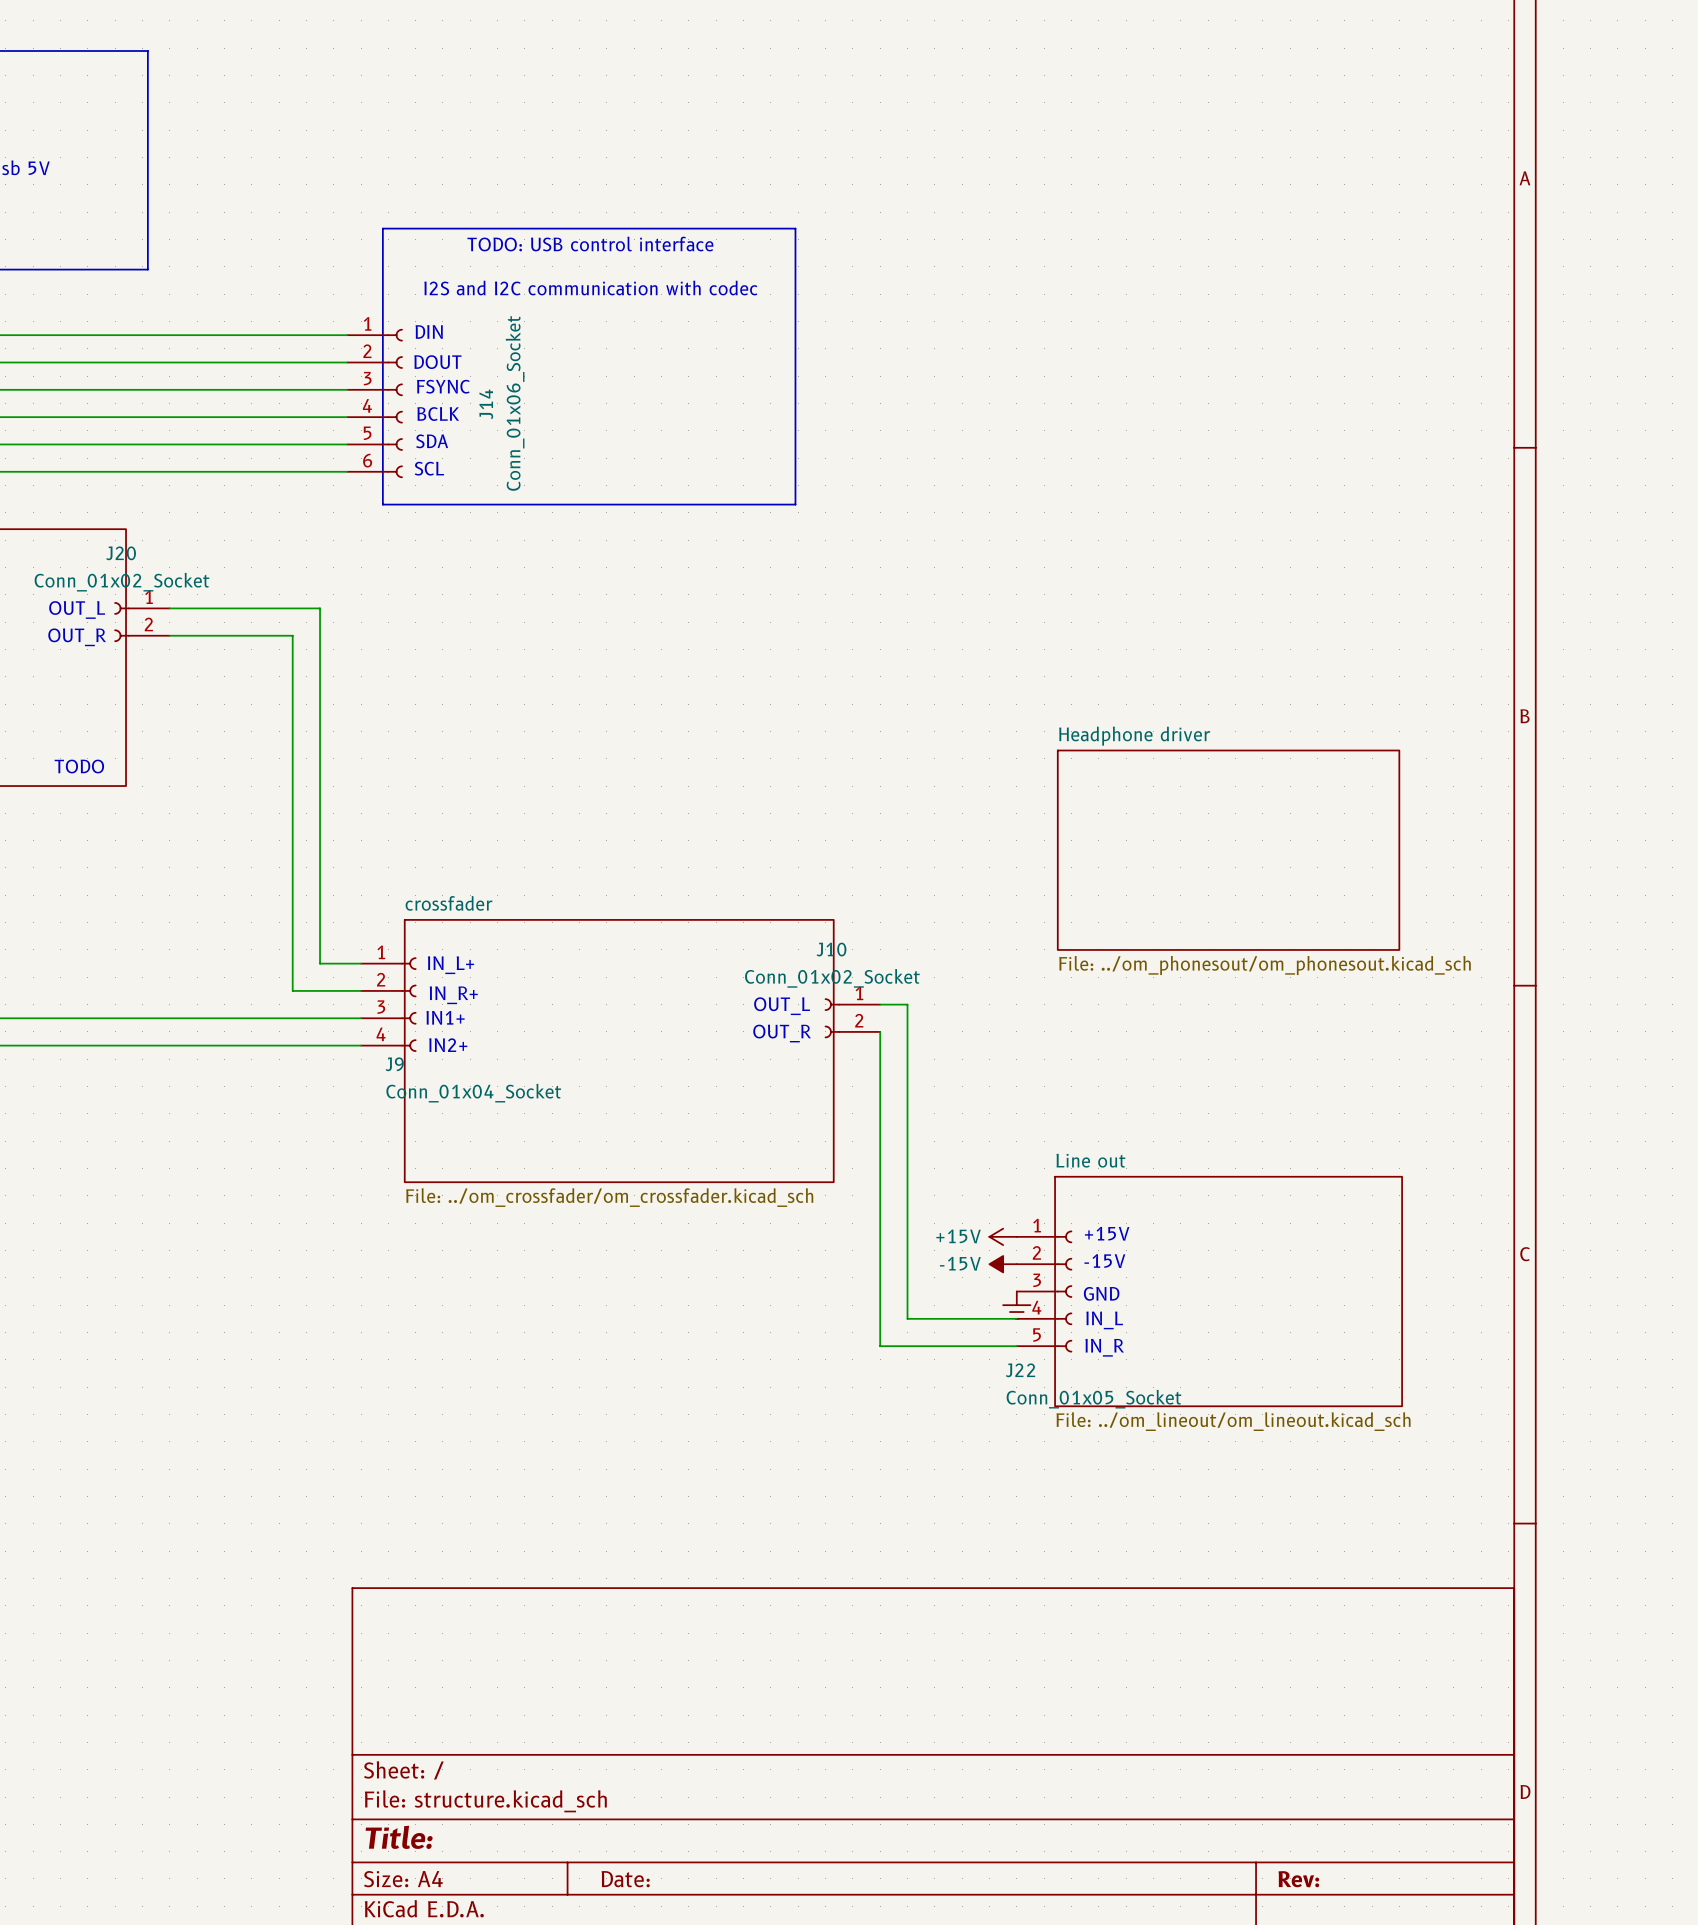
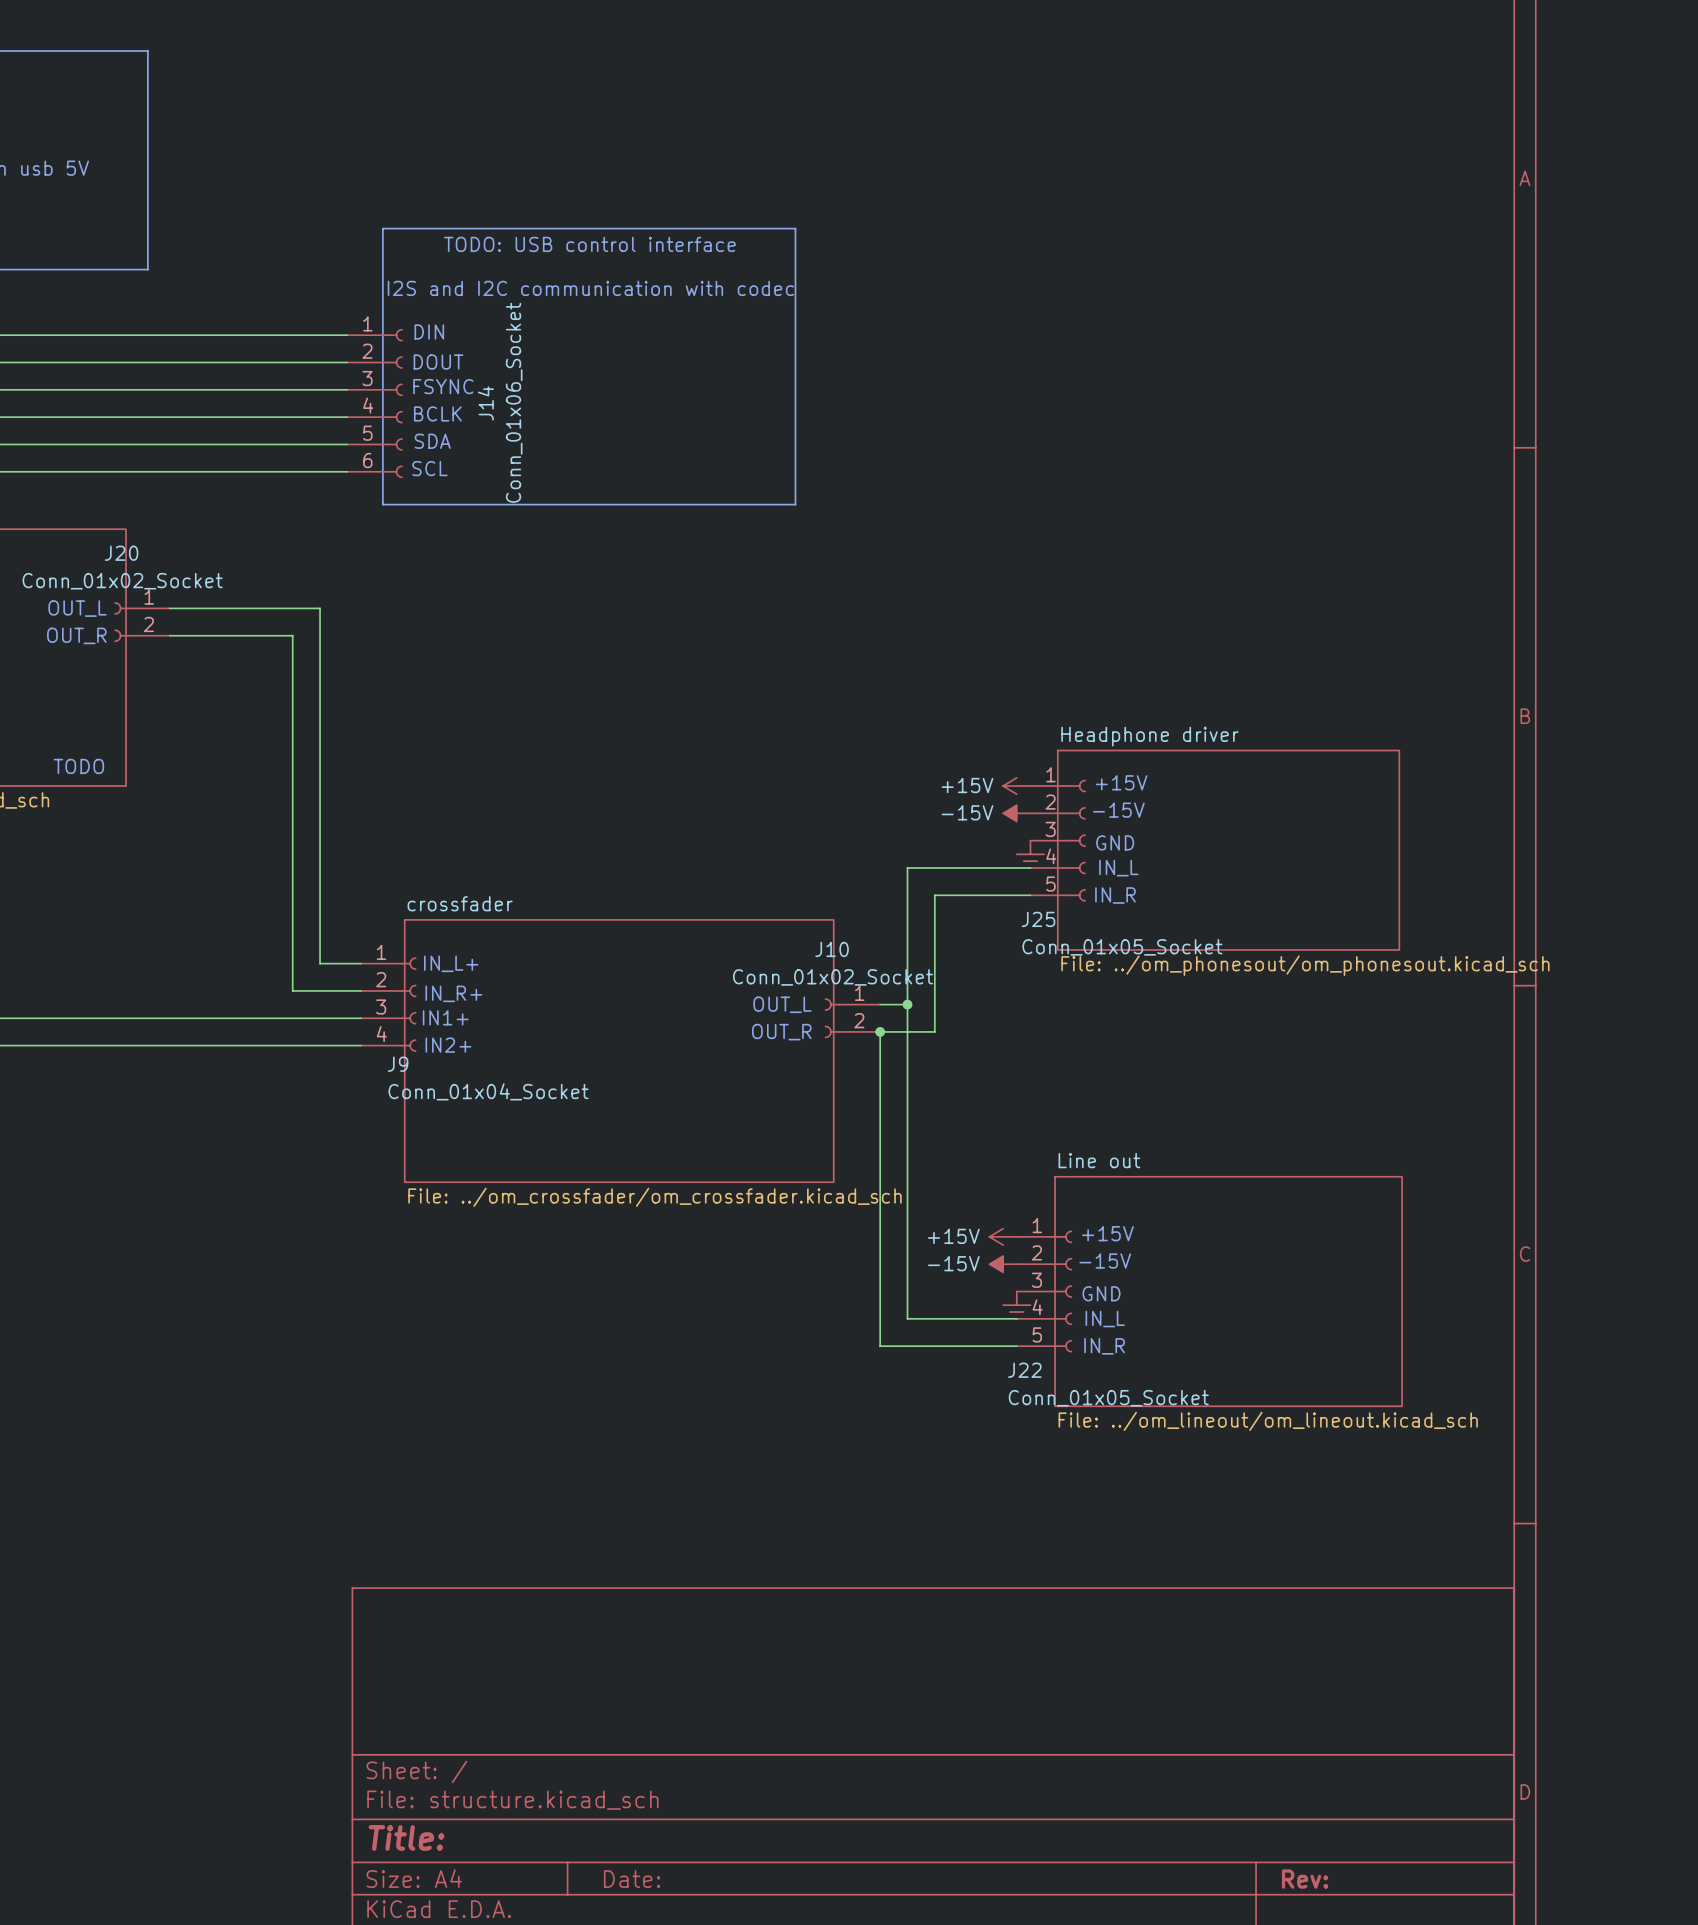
text: none -> +15V (1121, 782)
power symbol: none -> +15V (1016, 786)
text: none -> -15V (1118, 810)
power symbol: none -> -15V (1016, 813)
J25: none -> Conn_01x05_Socket (1058, 840)
text: none -> GND (1115, 842)
power symbol: none -> (1030, 854)
wire: none -> (1030, 867) (907, 867) (907, 1004)
text: none -> IN_L (1118, 868)
wire: none -> (1030, 895) (934, 895) (934, 1031) (880, 1031)
text: none -> IN_R (1115, 895)
junction: none -> (907, 1004)
junction: none -> (880, 1031)

